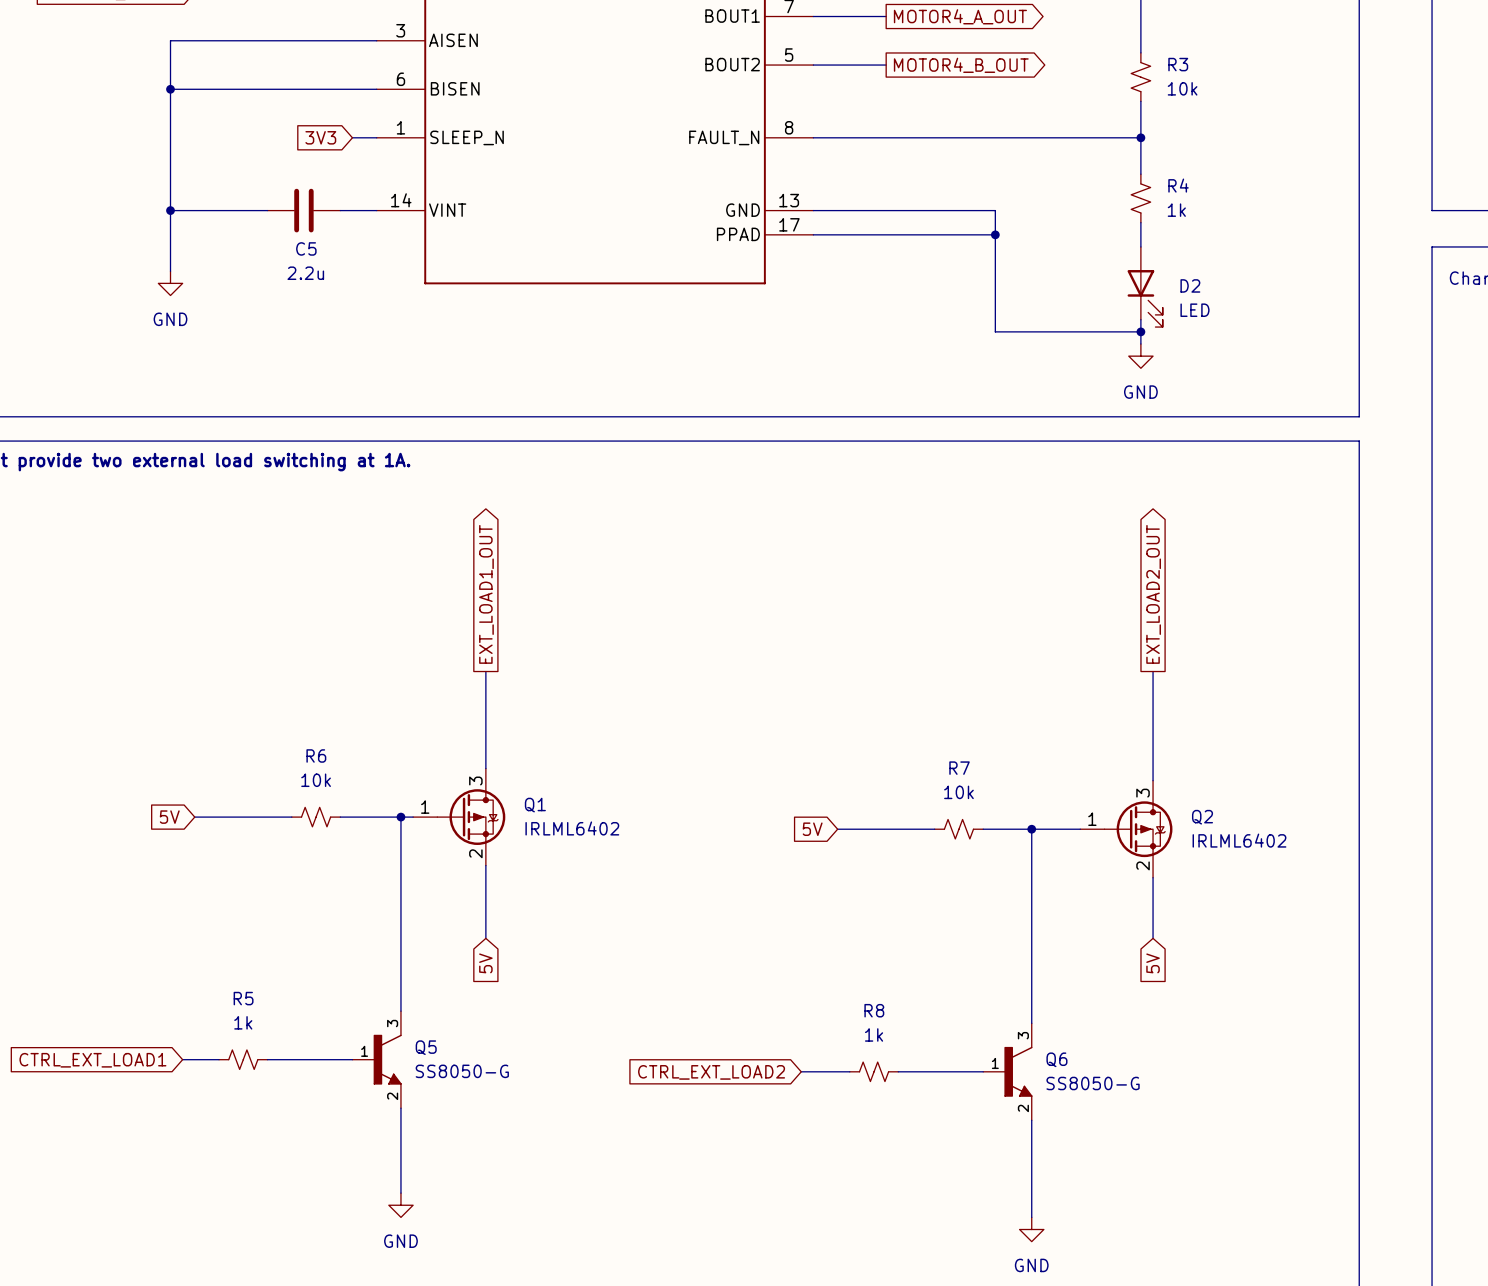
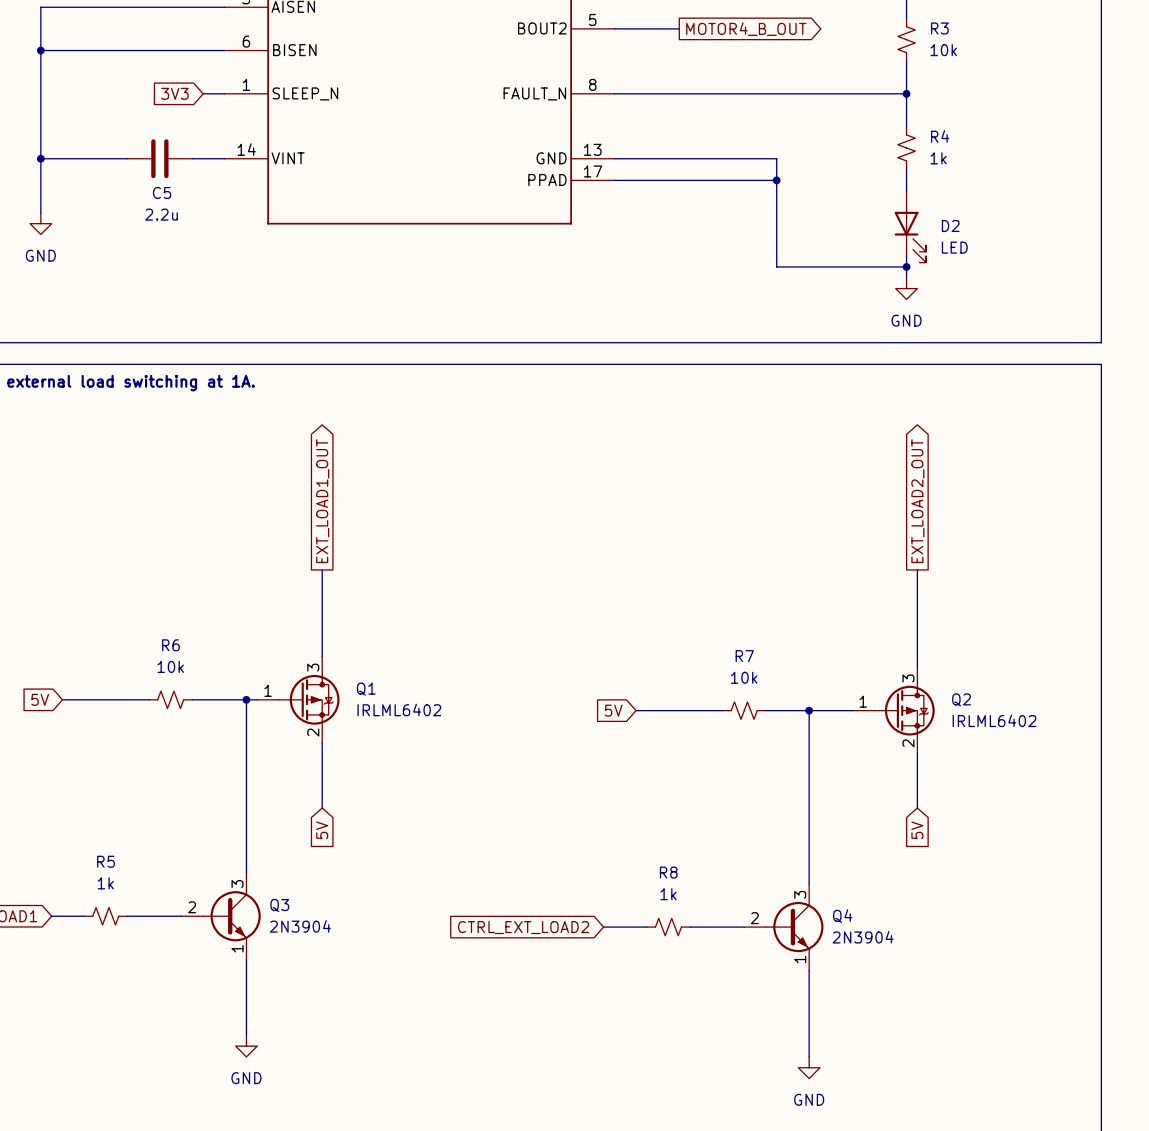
Q3: none -> 2N3904 (221, 916)
Q5: SS8050-G (377, 1059) -> none
Q4: none -> 2N3904 (783, 927)
Q6: SS8050-G (1007, 1071) -> none

